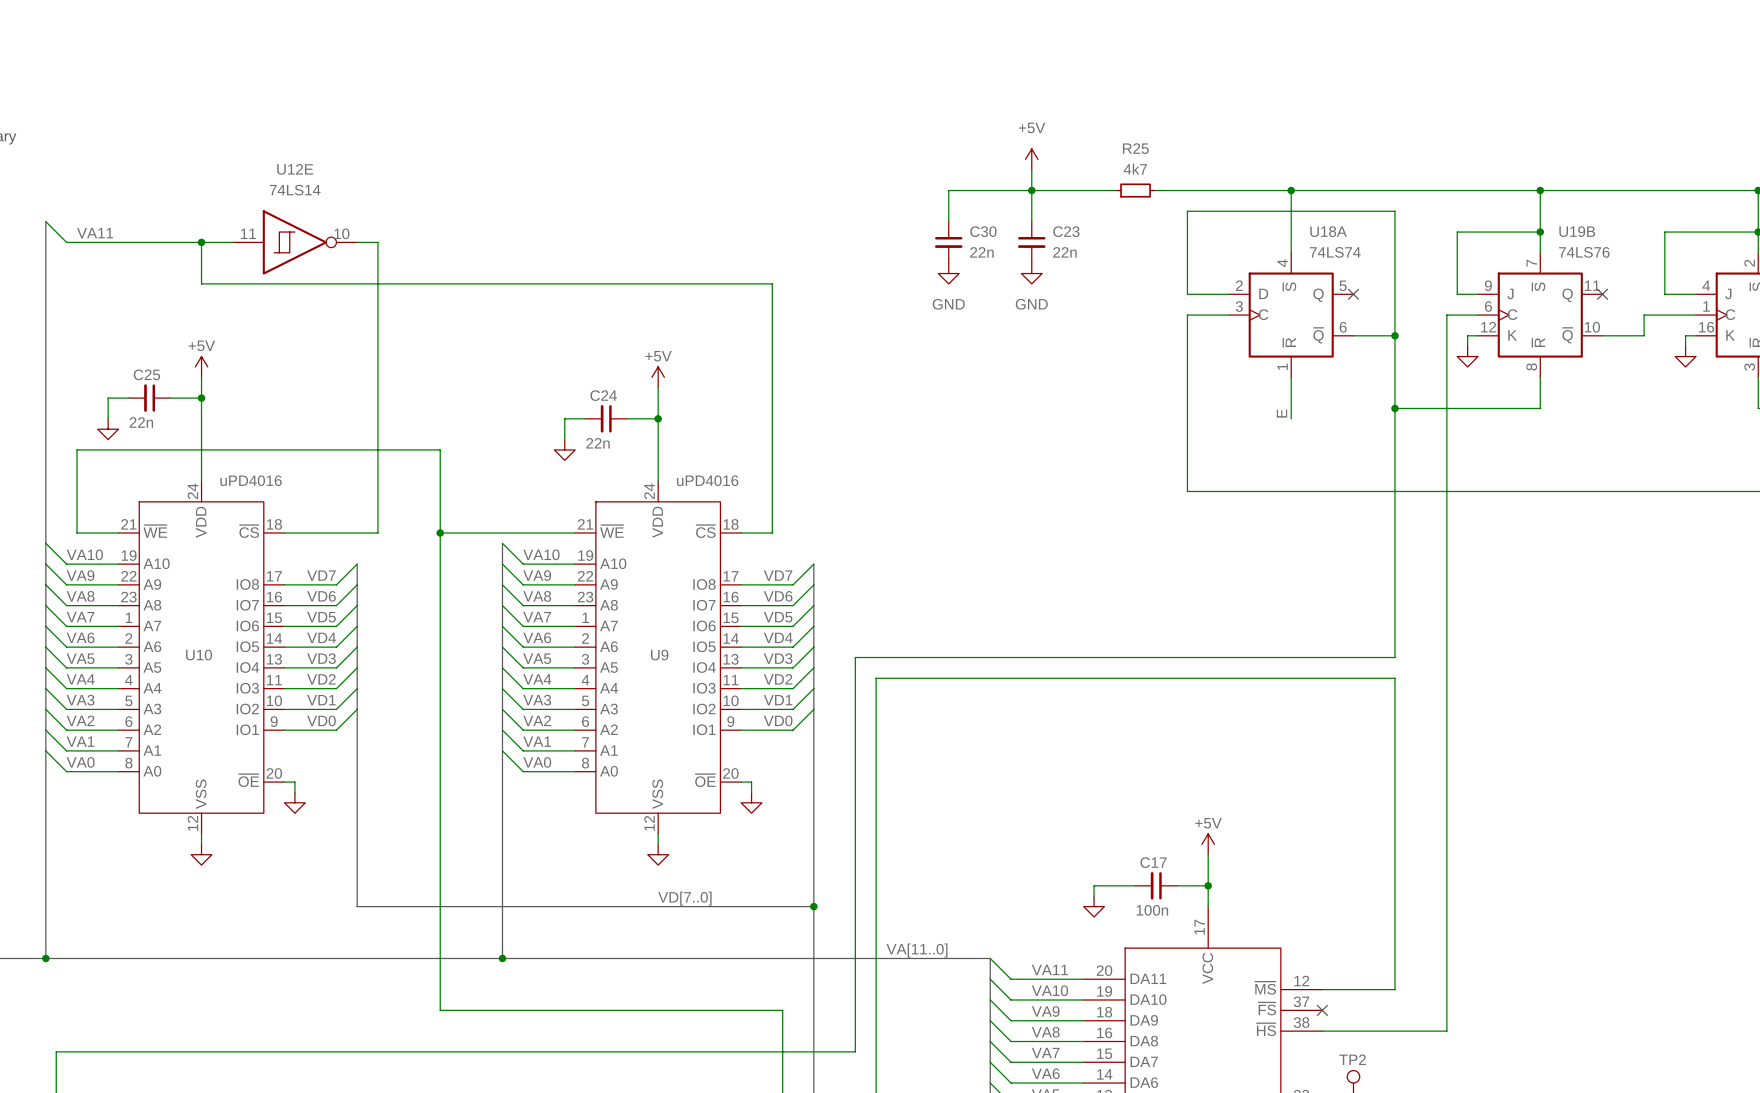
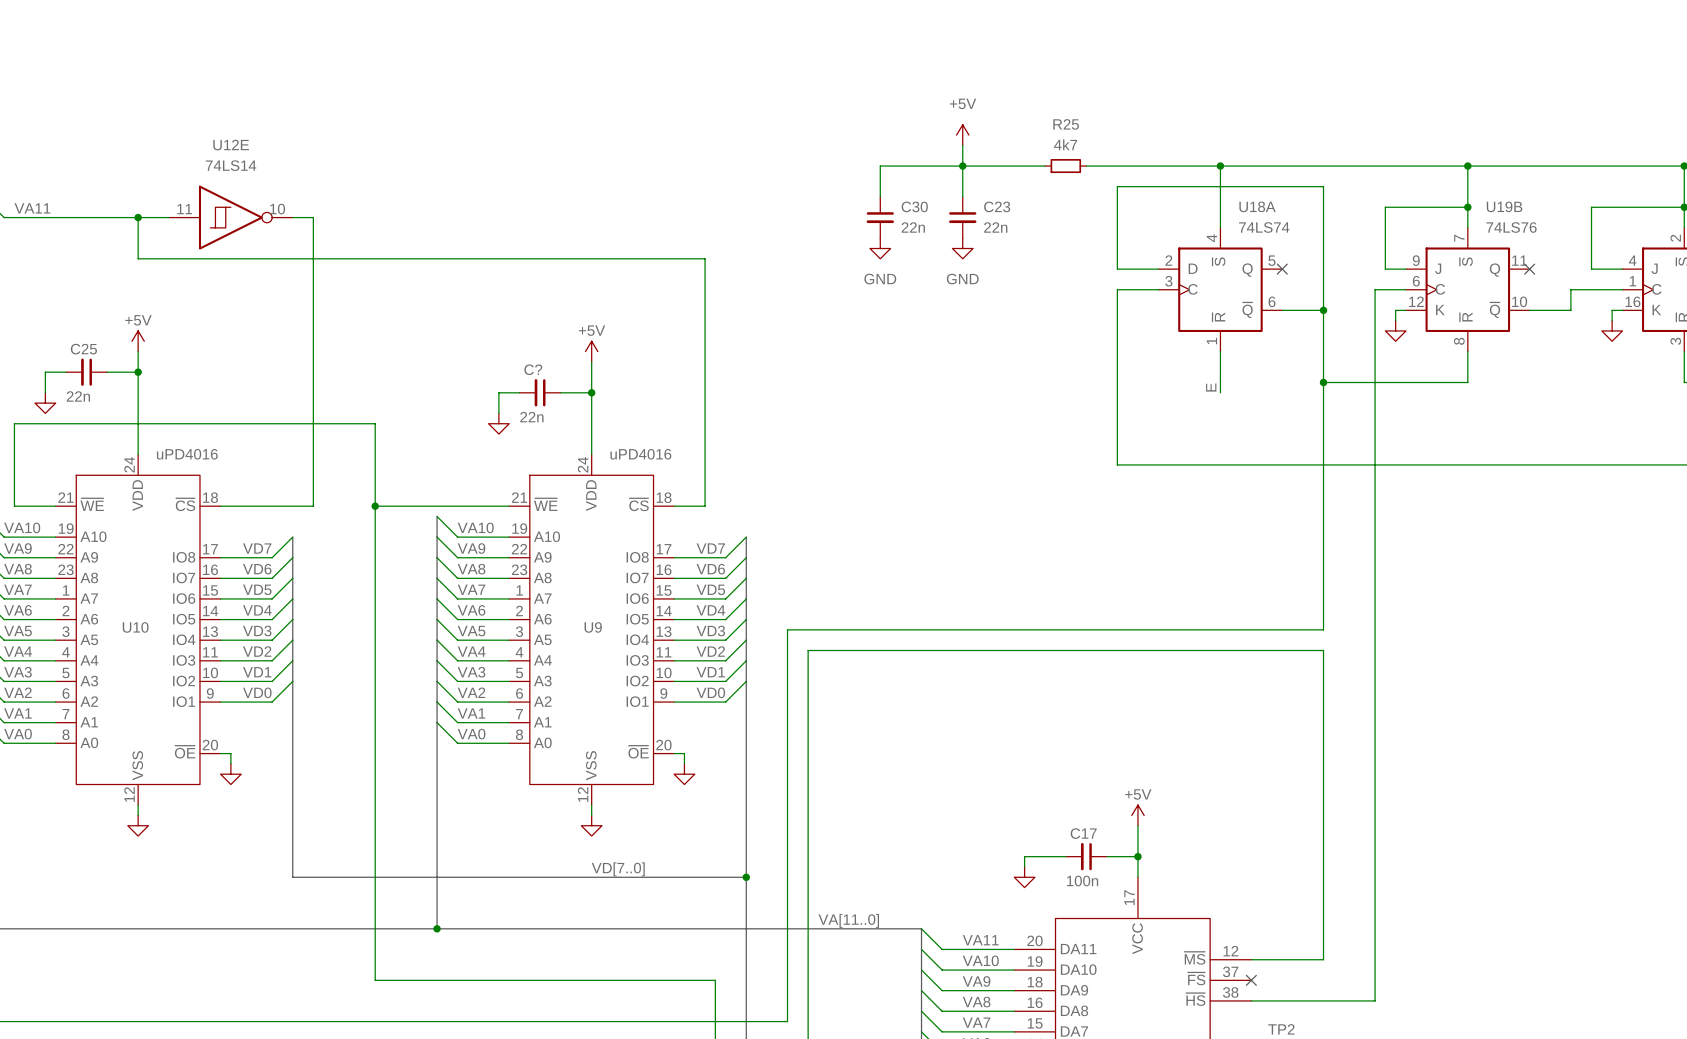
C24 name: C24 (603, 395) -> C? (533, 369)

